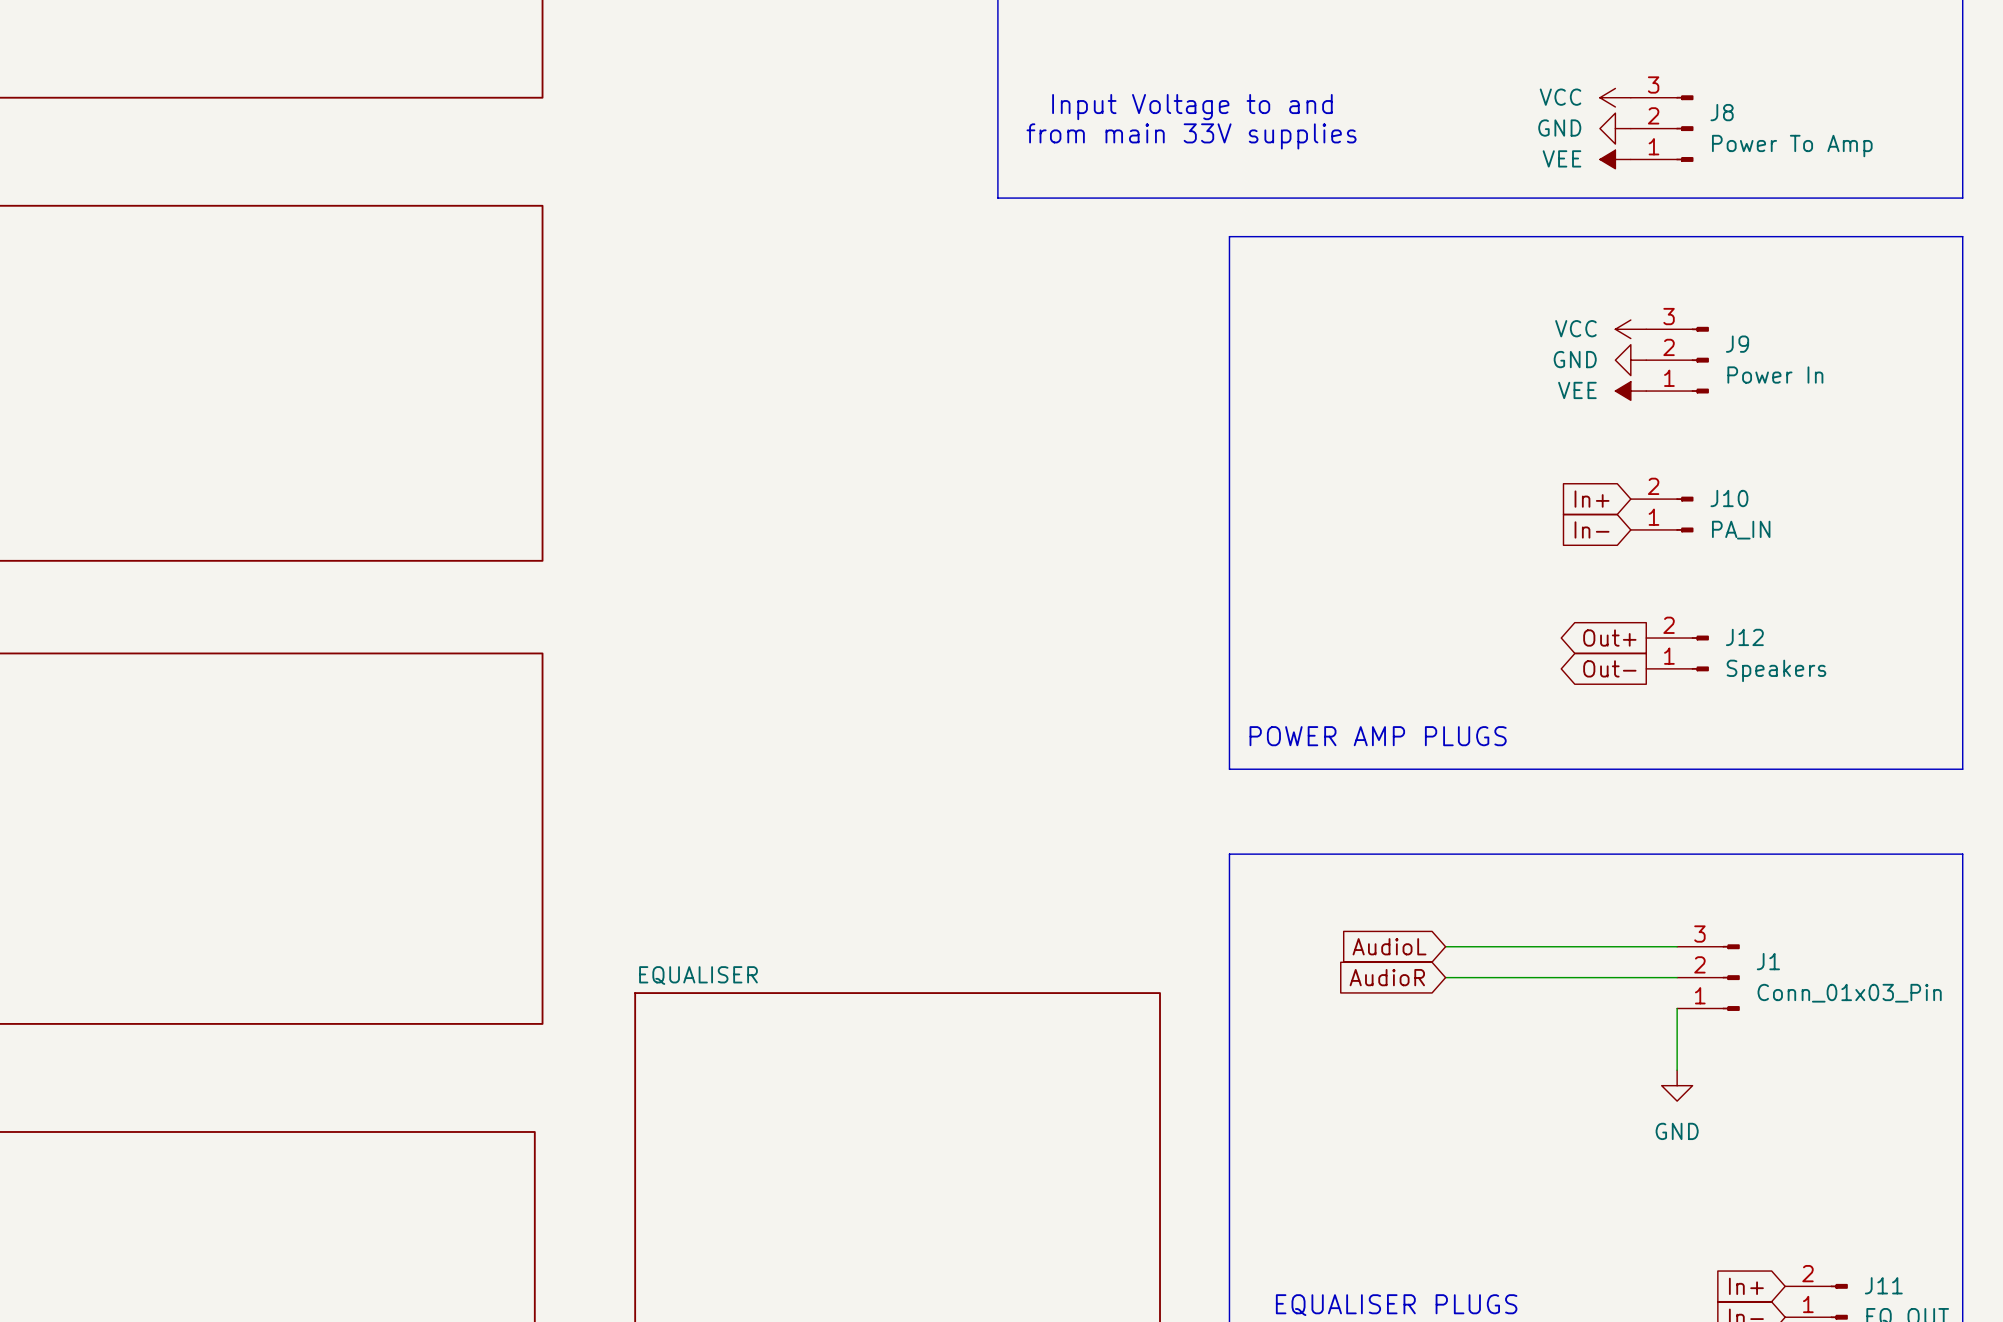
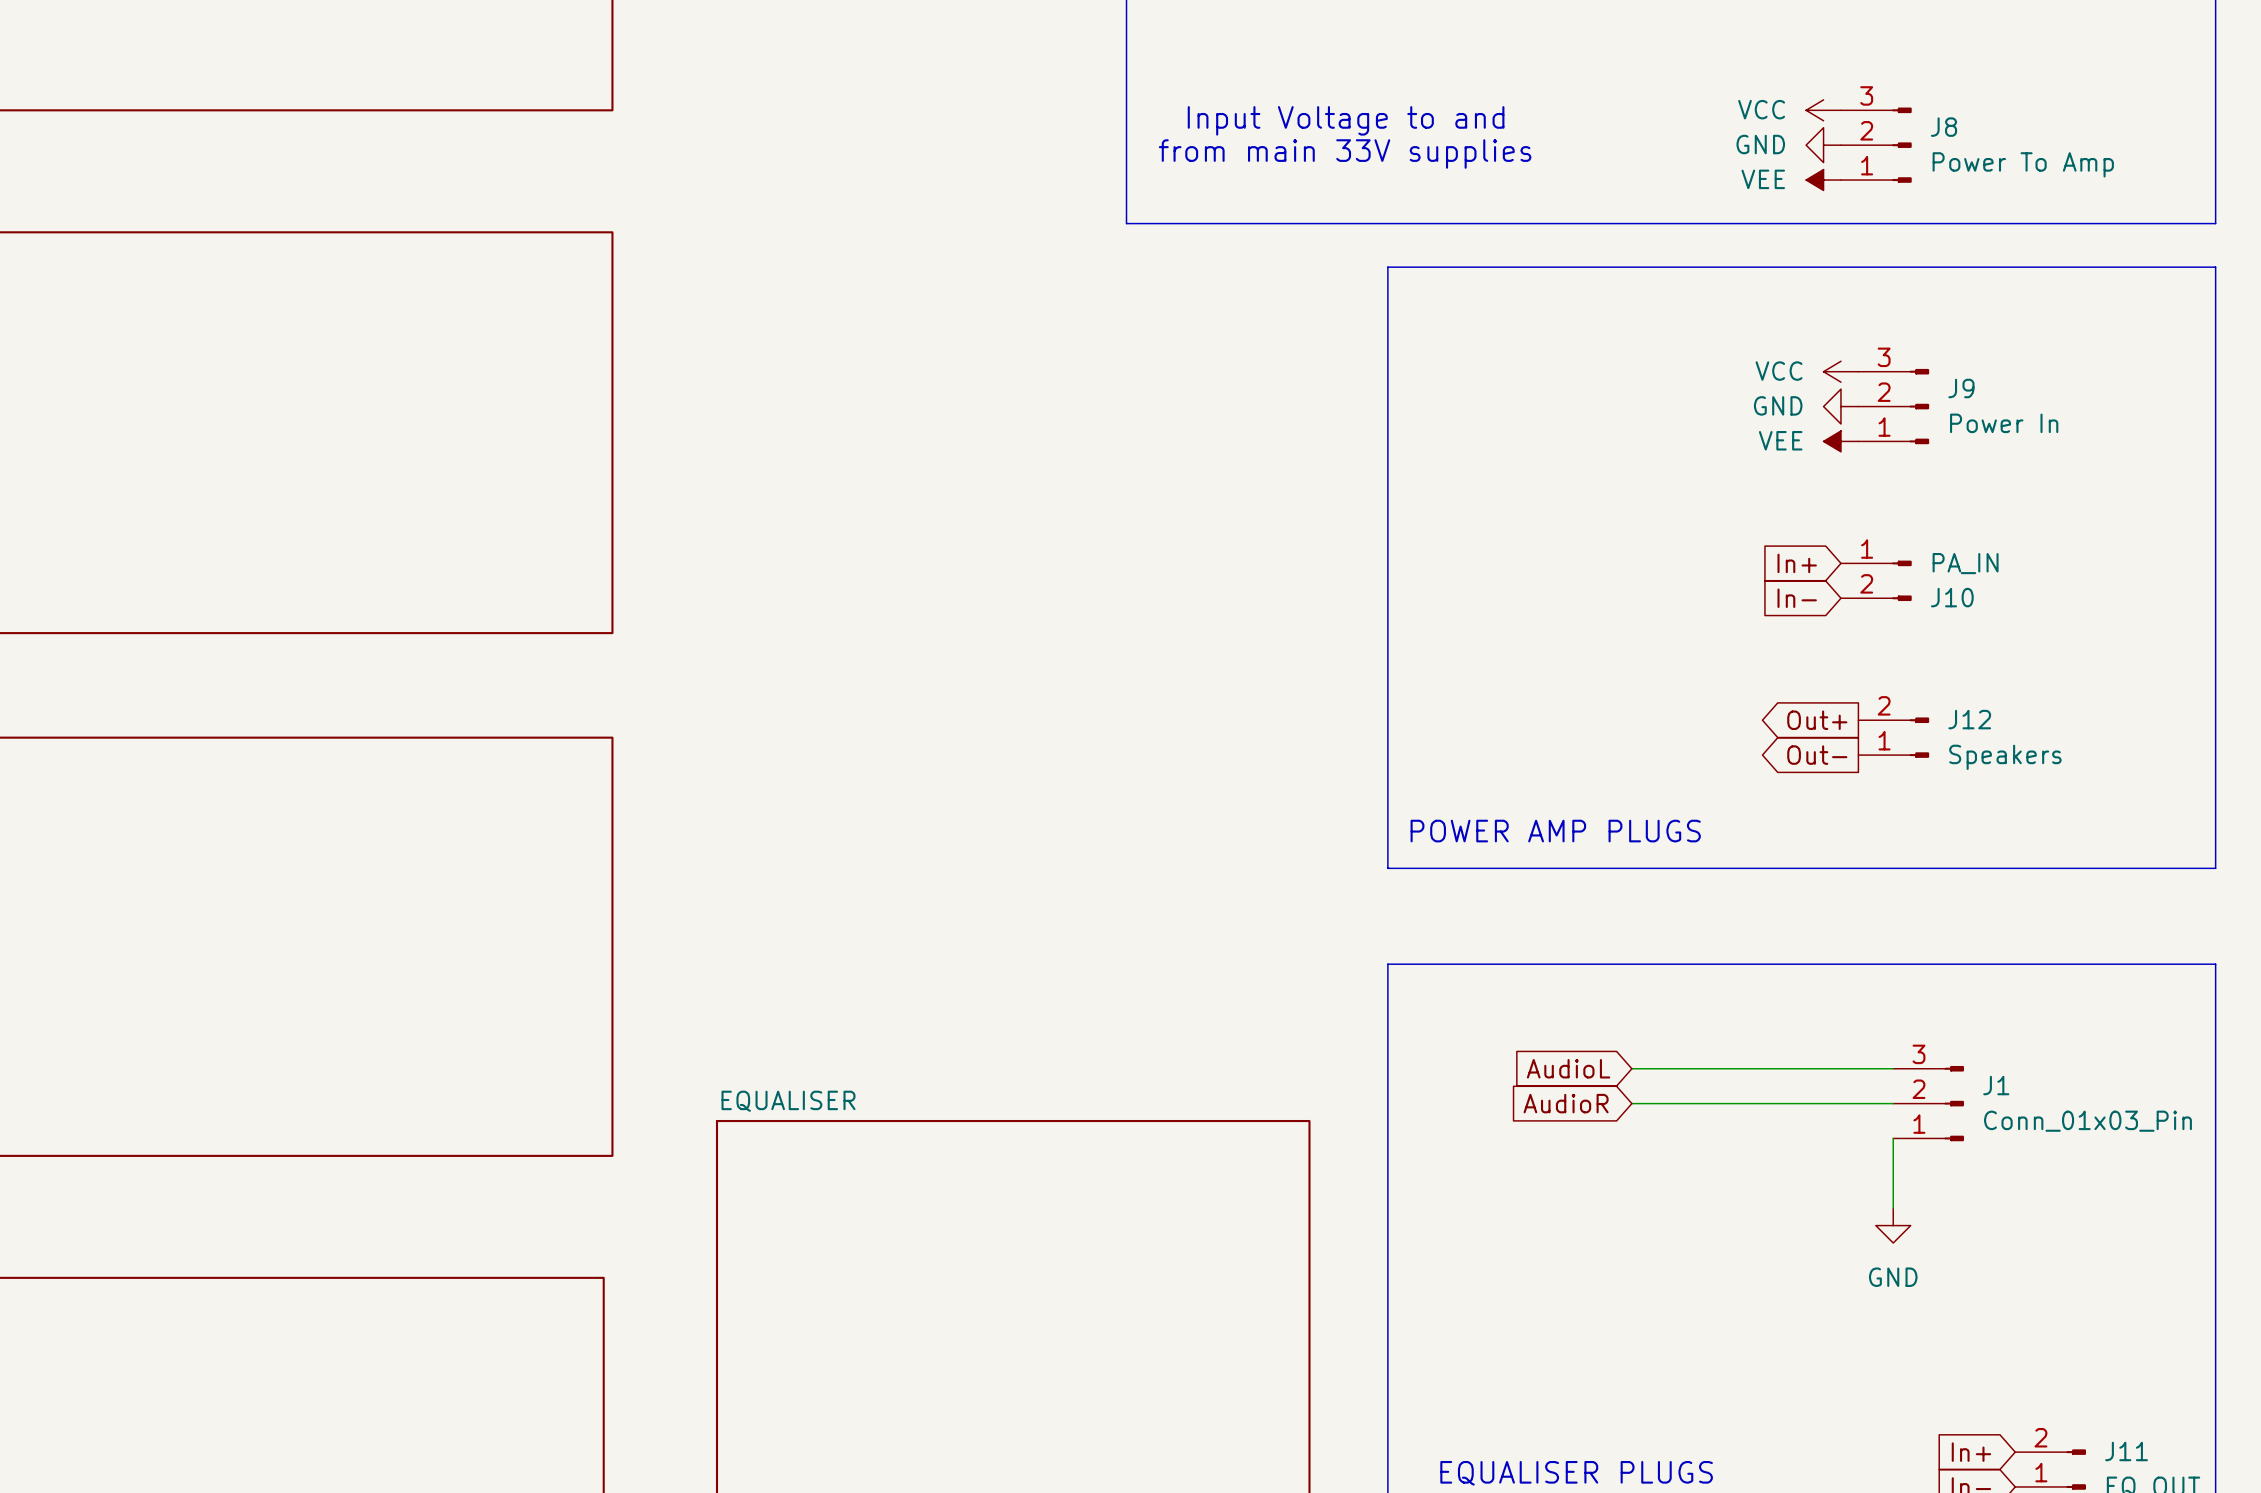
J10 flip: as is (1684, 514) -> up-down (1901, 580)

